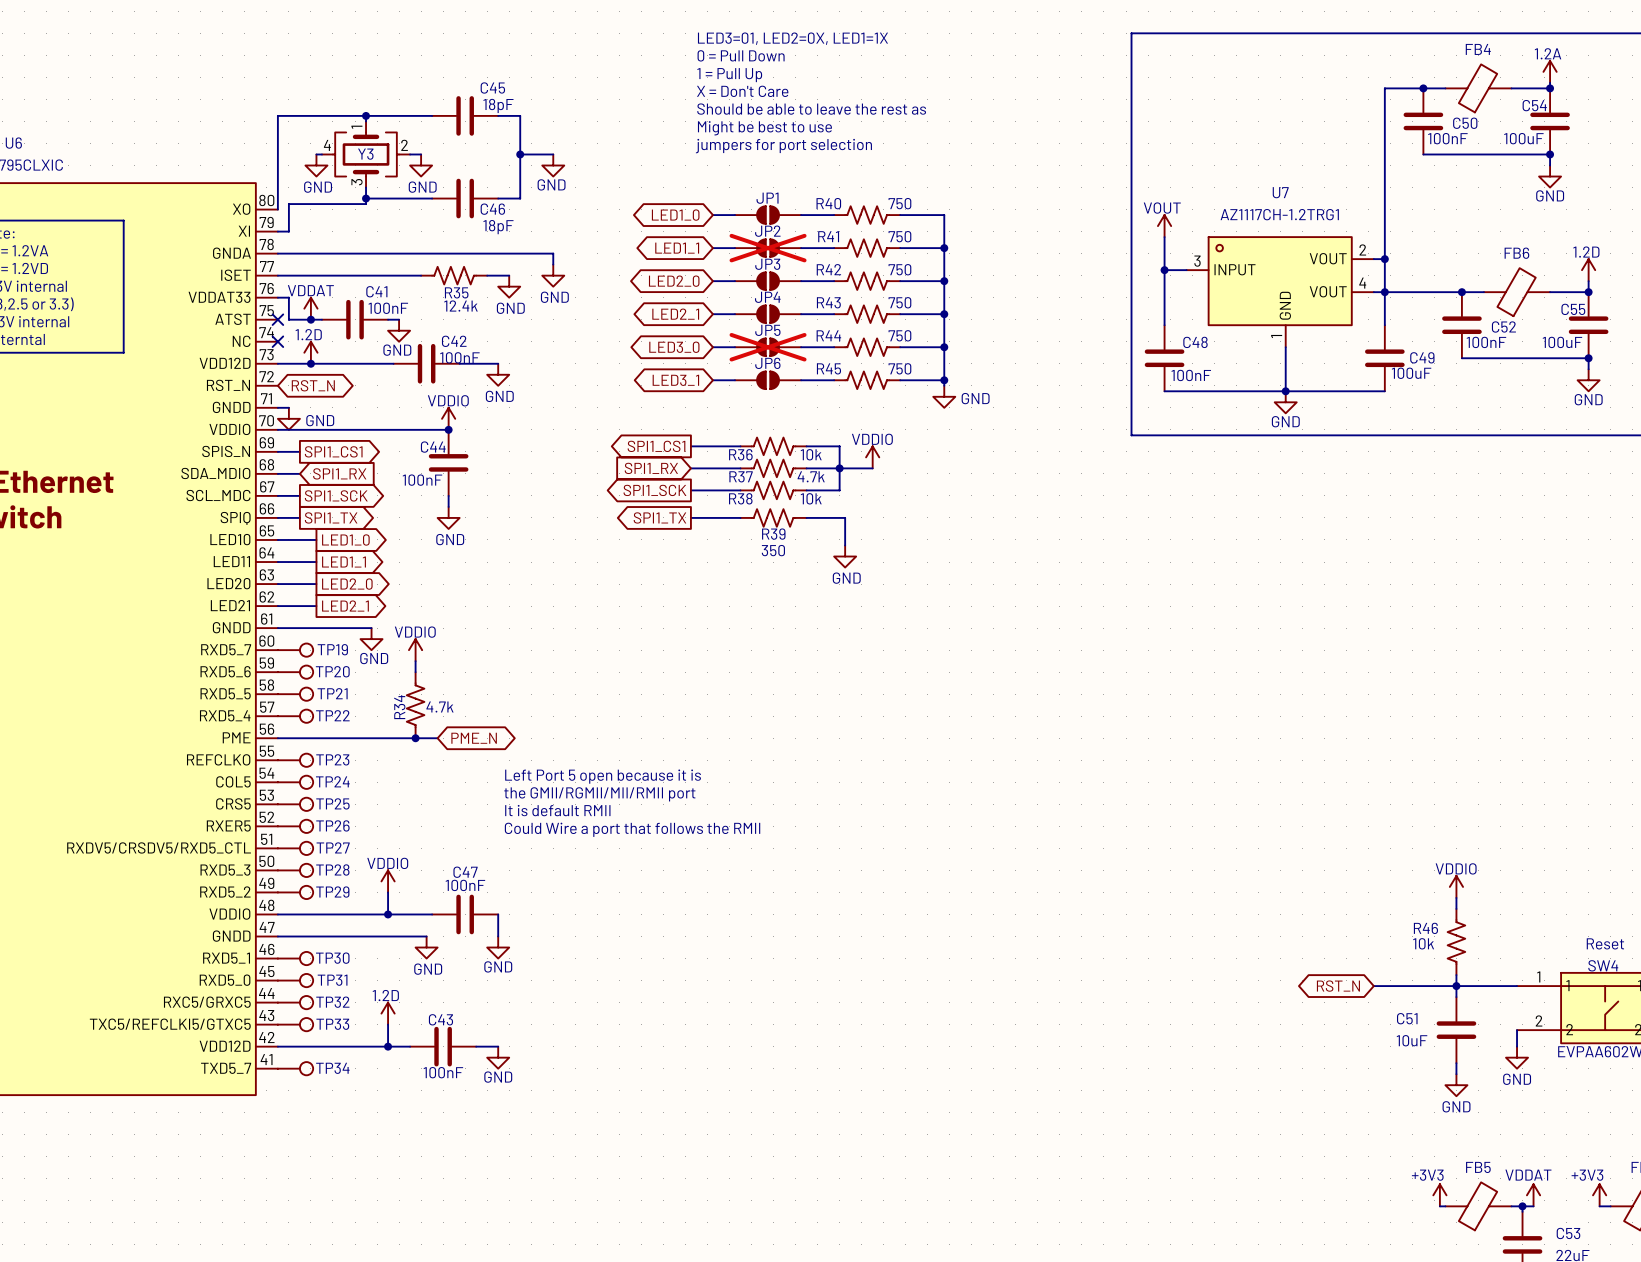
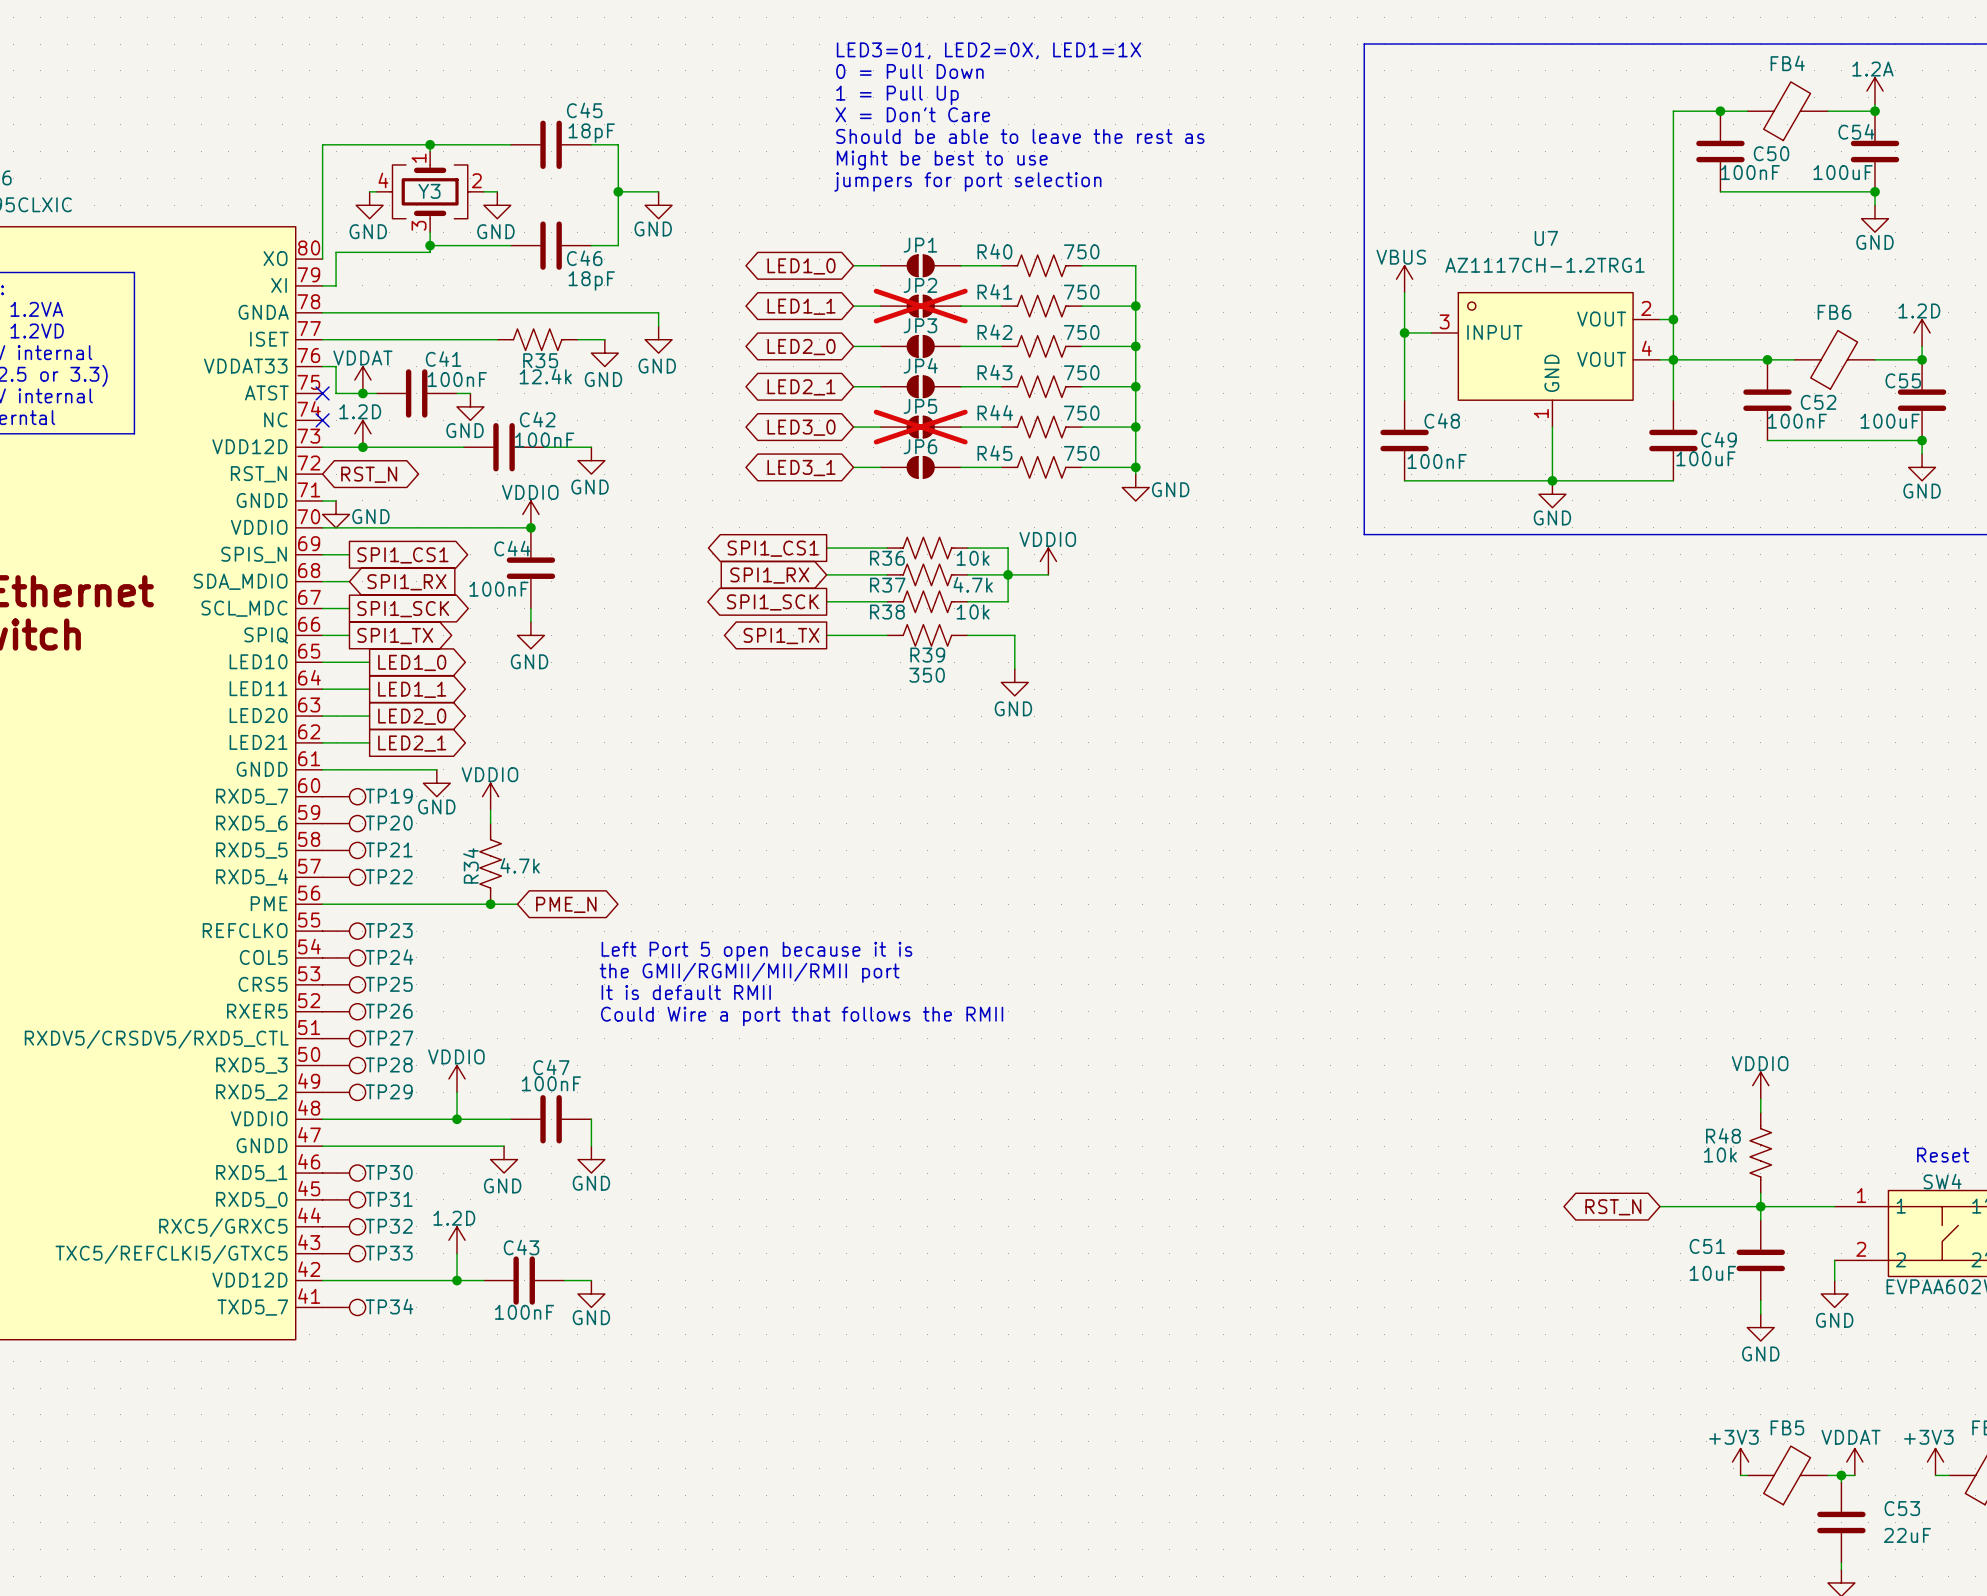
power symbol: VOUT (1164, 226) -> VBUS (1404, 279)
R46 name: R46 (1425, 928) -> R48 (1723, 1135)

